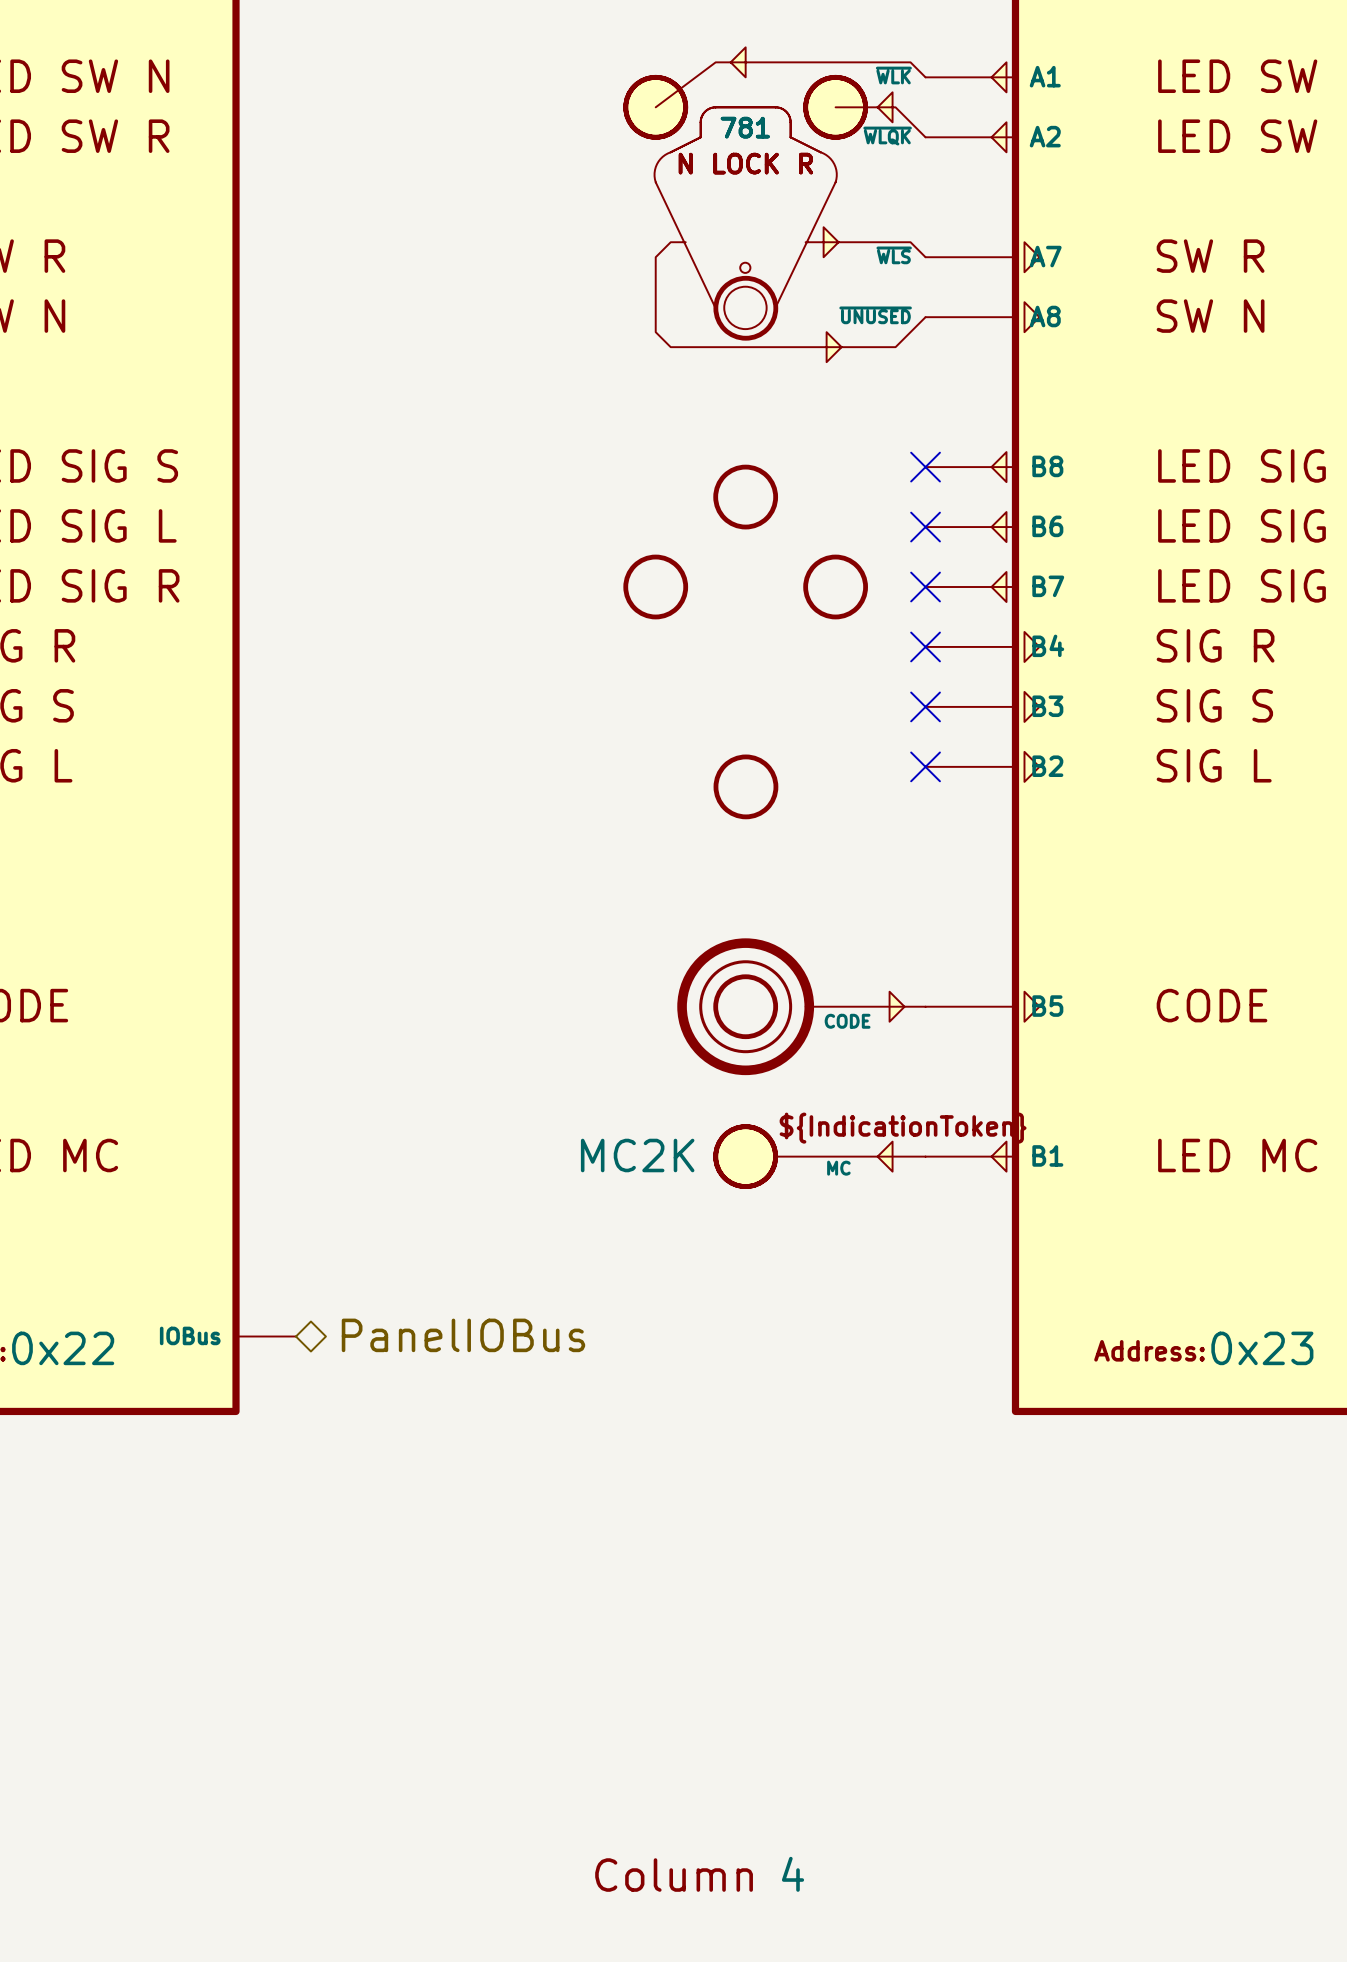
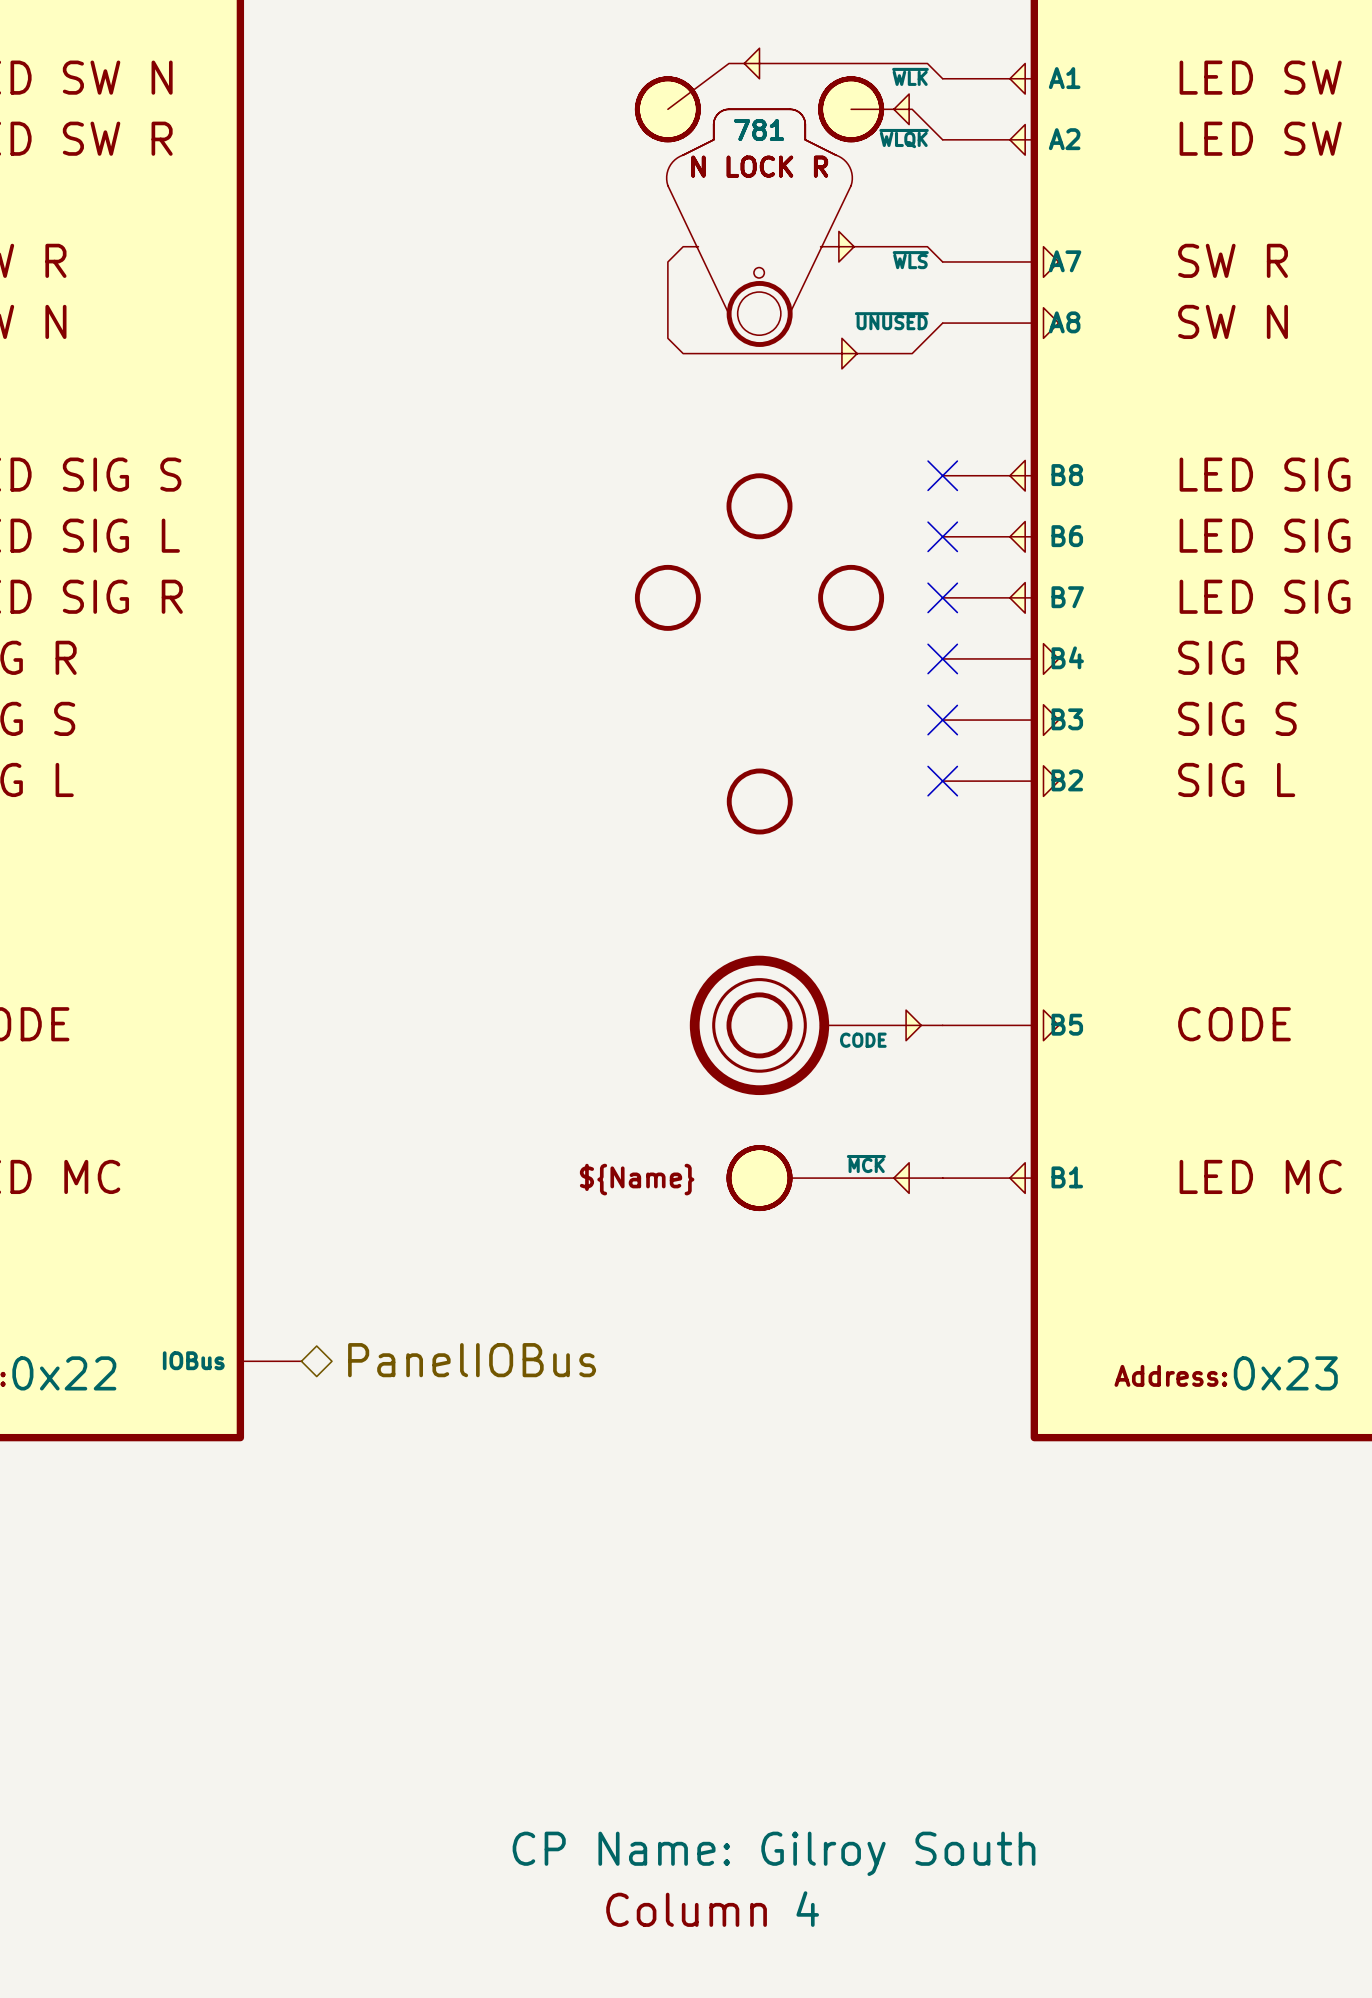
part text: ${IndicationToken} (903, 1128) -> none
part pin name: none -> ~{MCK} (866, 1164)
part text: MC2K (637, 1155) -> none
part text: none -> ${Name} (637, 1179)
part value: MC (838, 1168) -> none
part text: none -> CP Name: Gilroy South (774, 1853)

